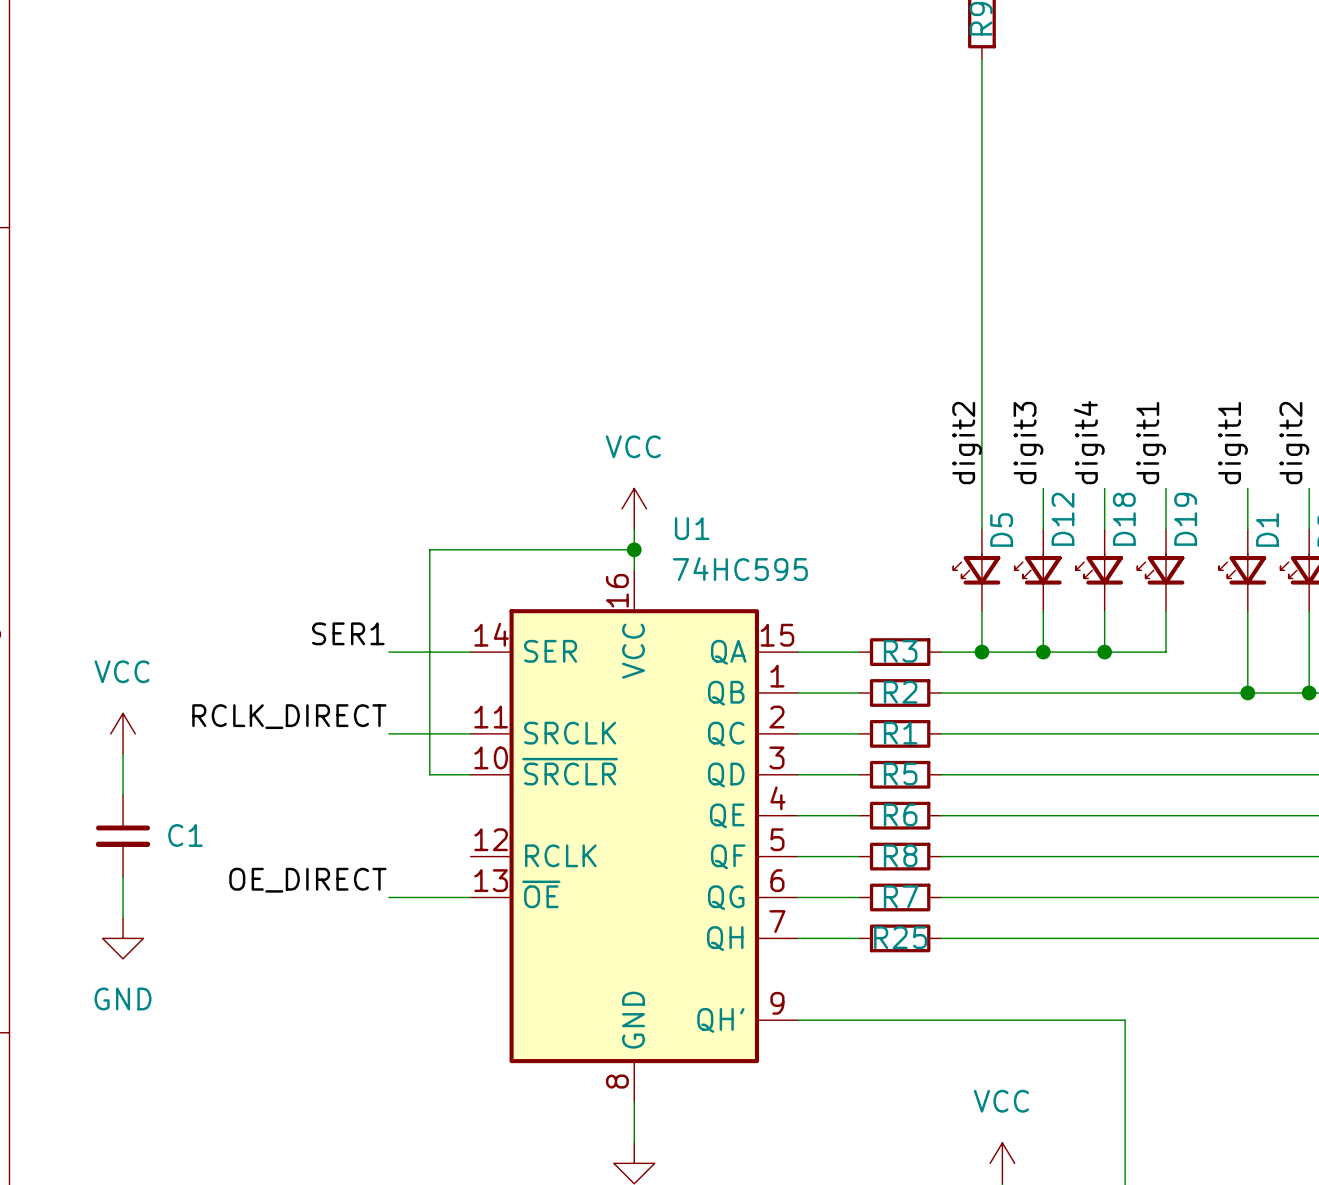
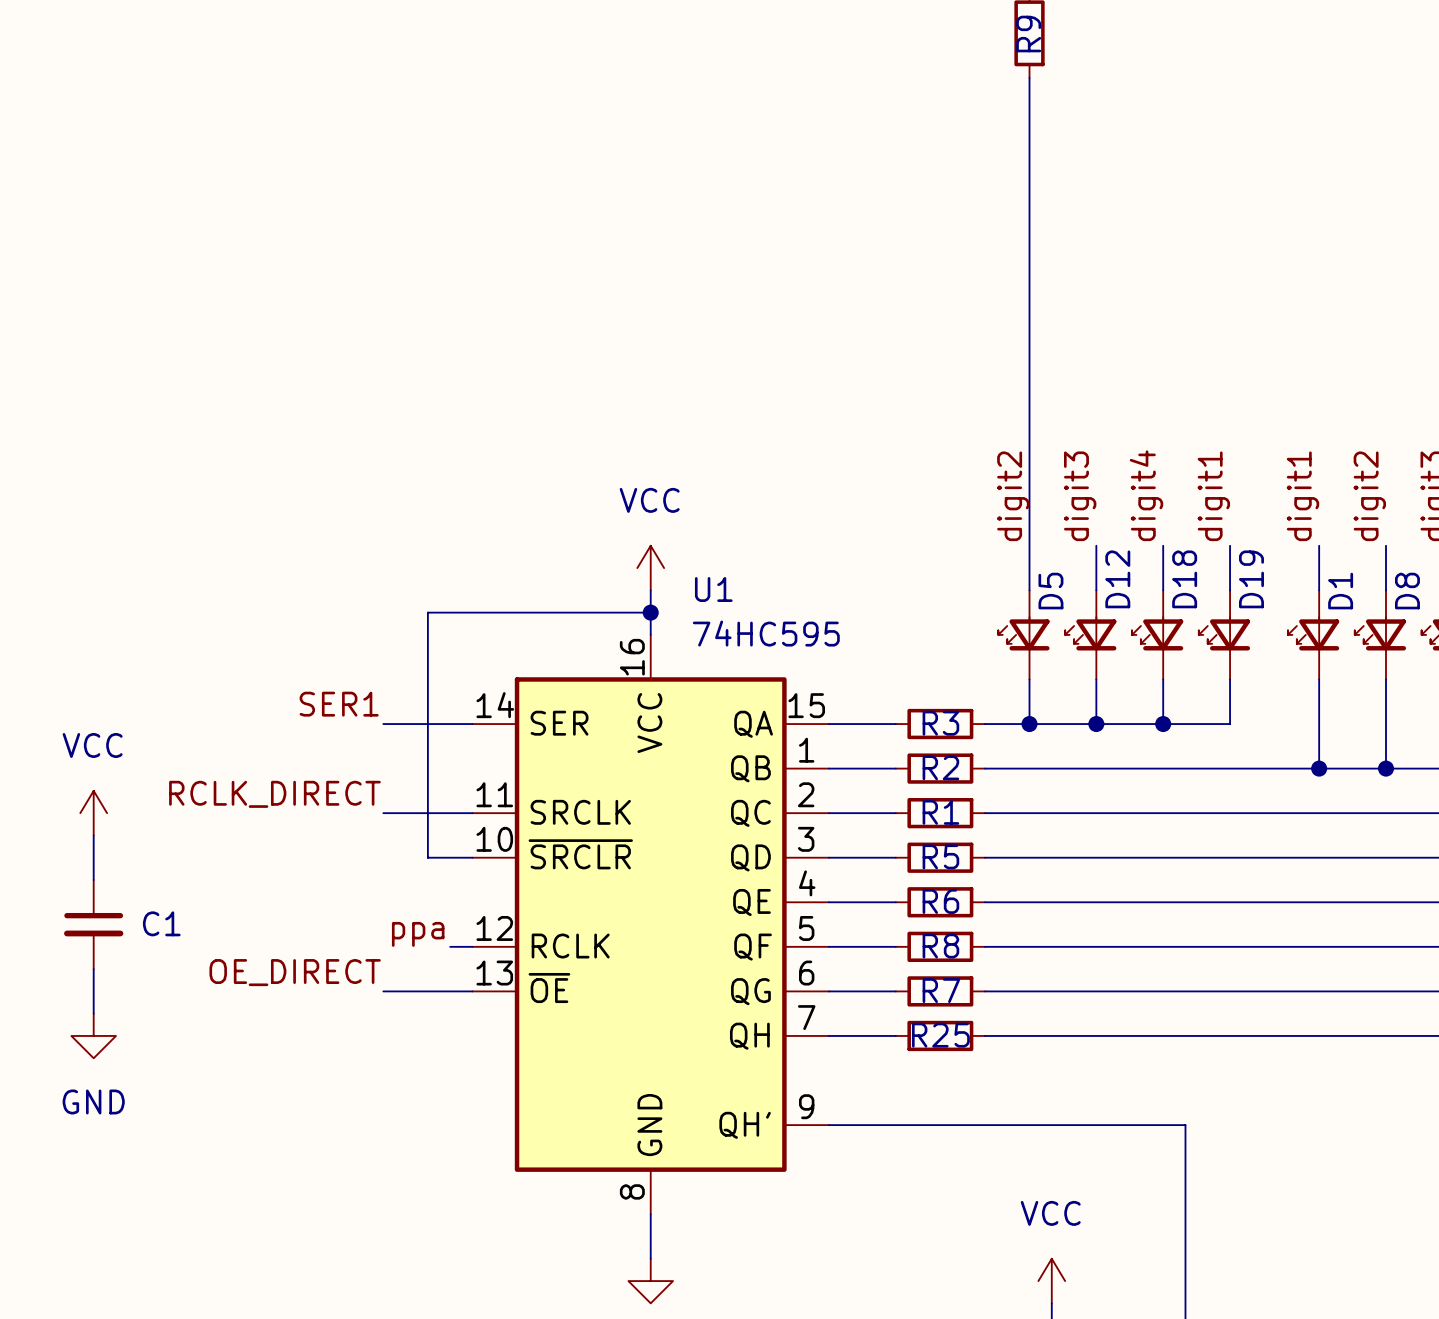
label: none -> ppa (418, 934)
wire: none -> (450, 946) (472, 946)

